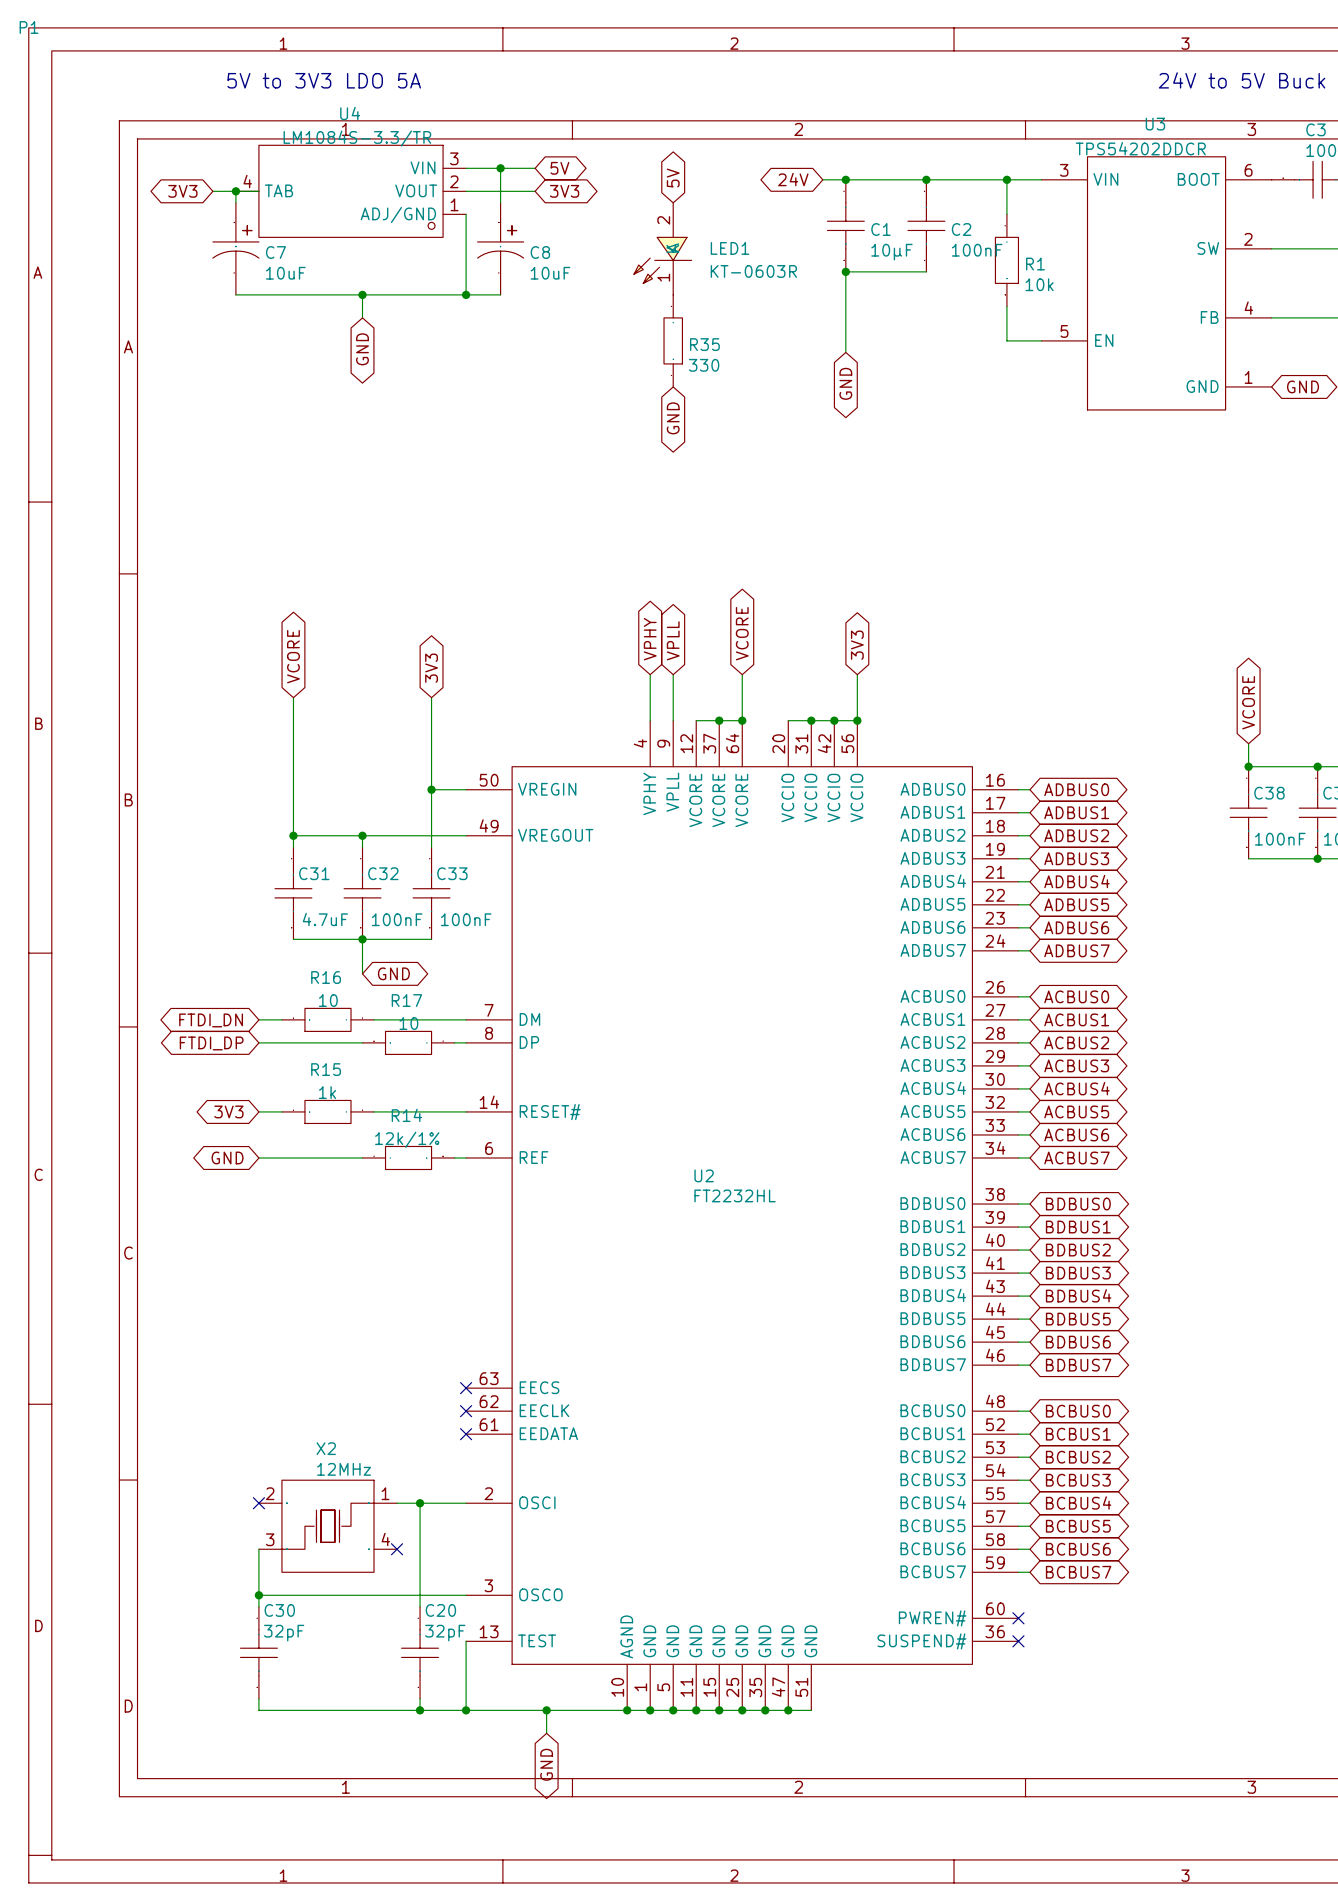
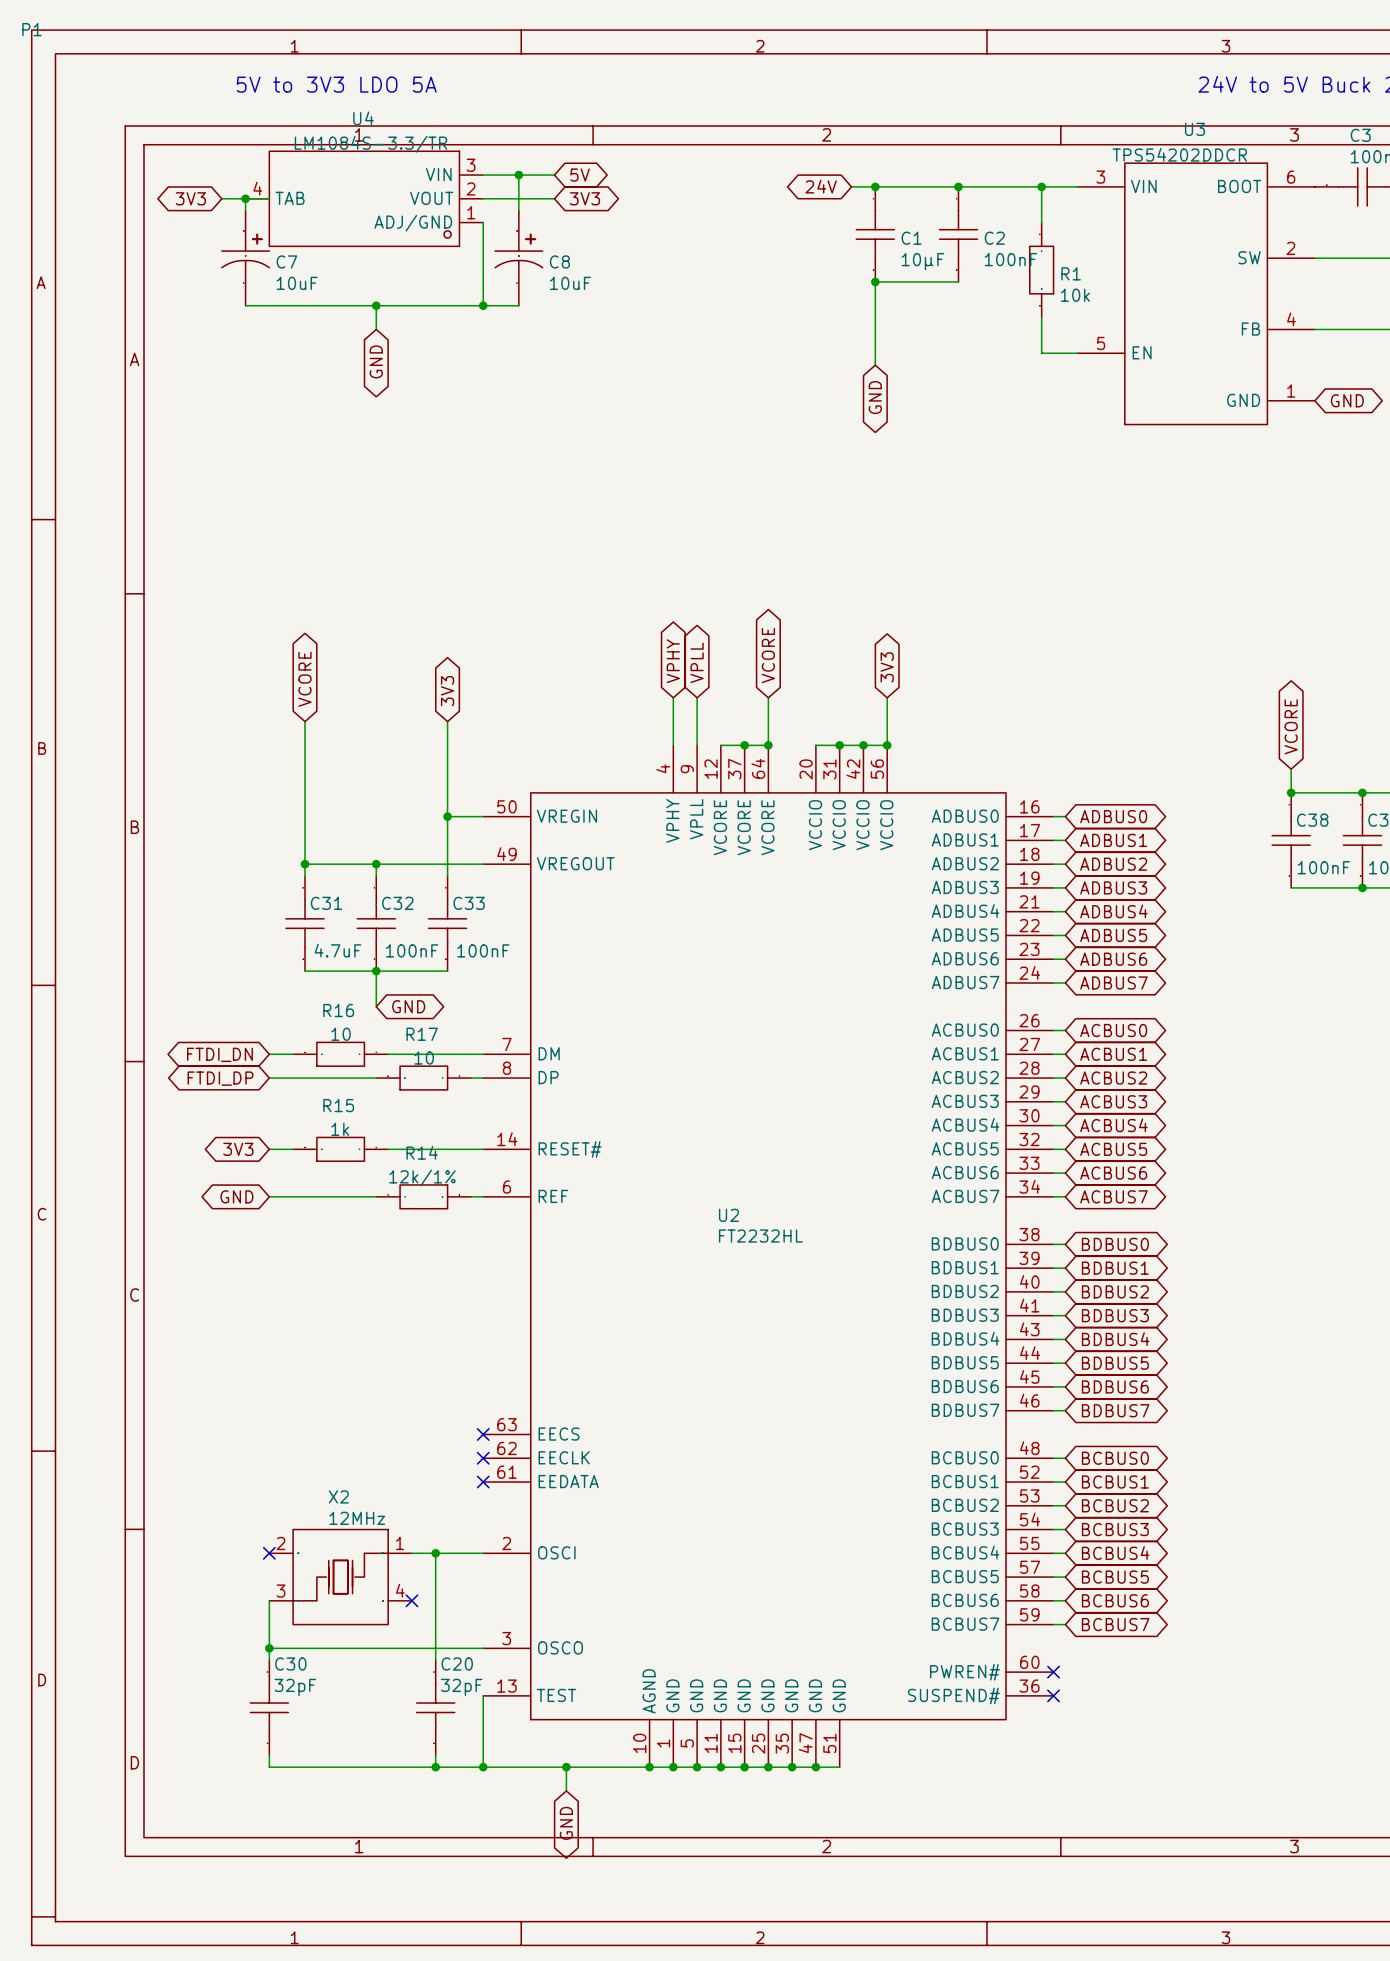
global label: 5V (673, 178) -> none
LED1: KT-0603R (662, 248) -> none
R35: 330 (673, 340) -> none
global label: GND (673, 418) -> none

